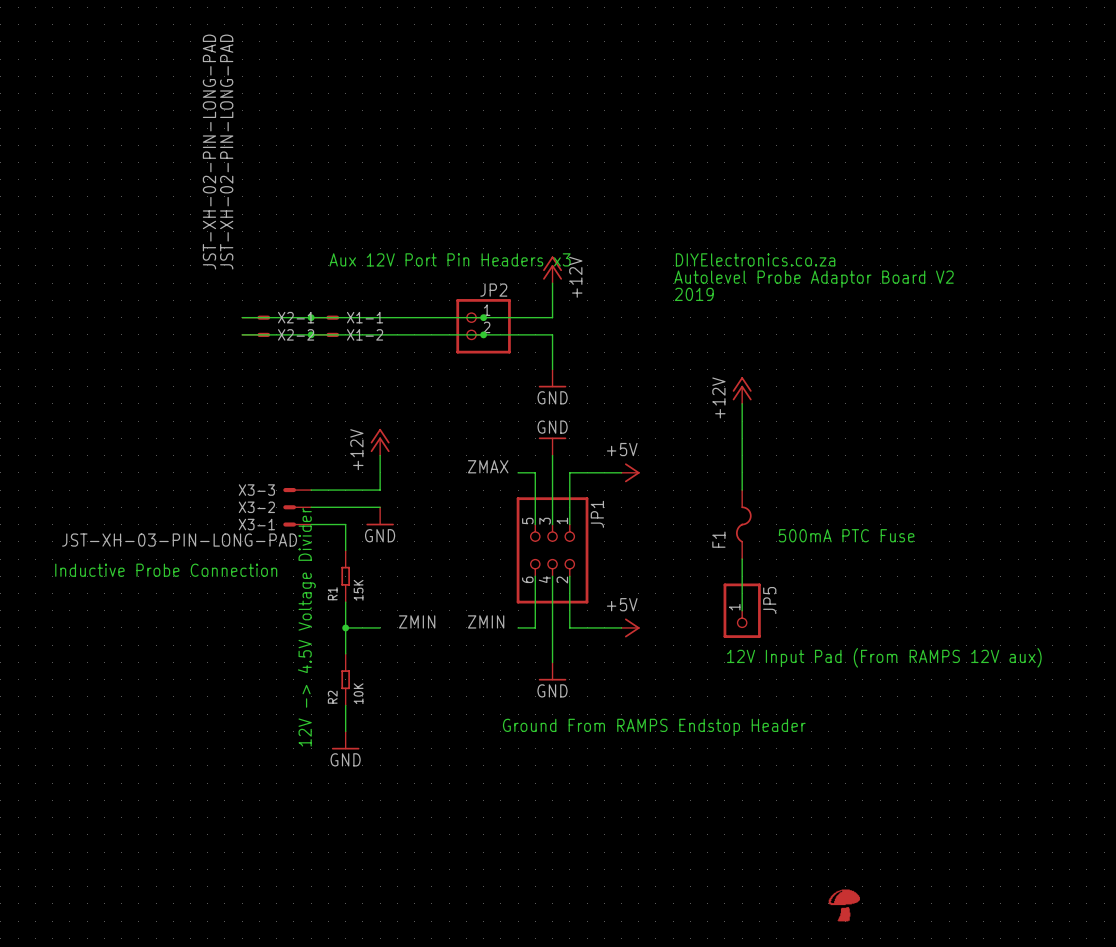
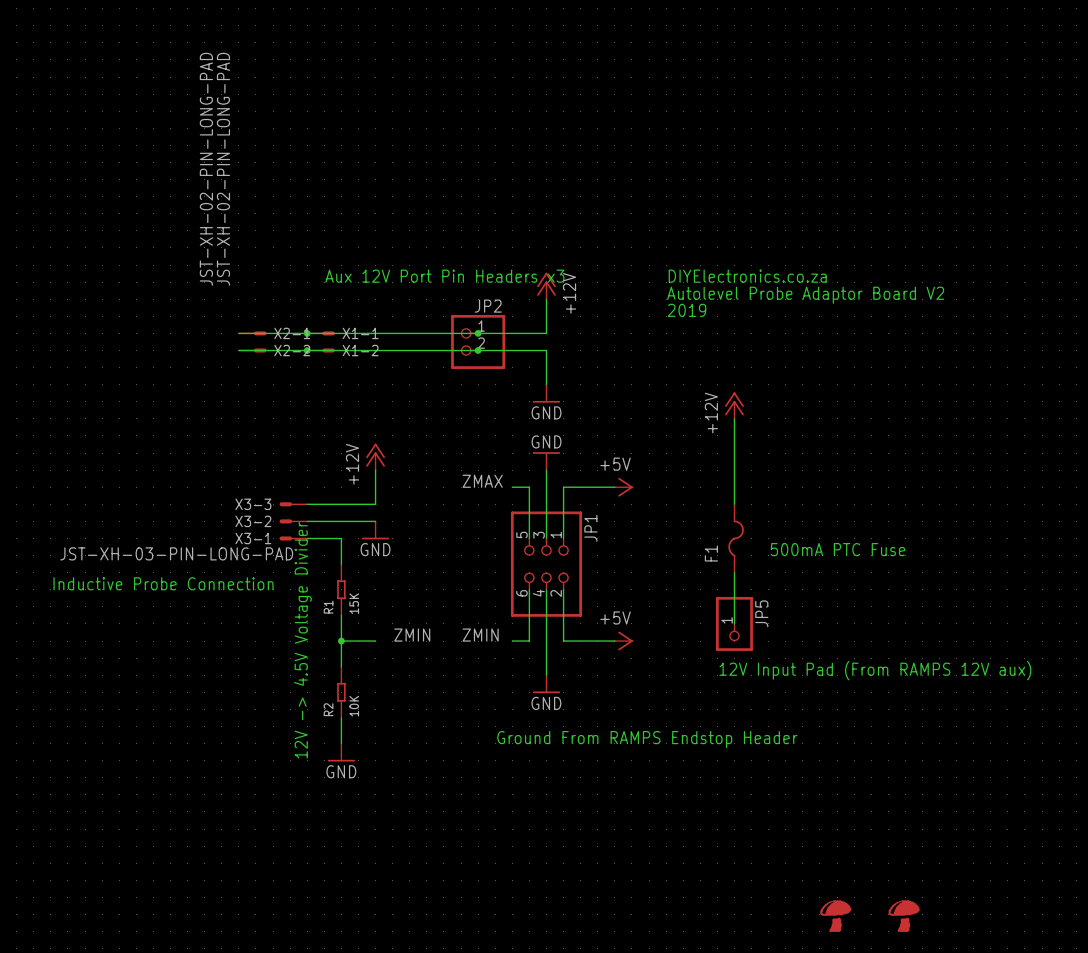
part: none -> (904, 916)

